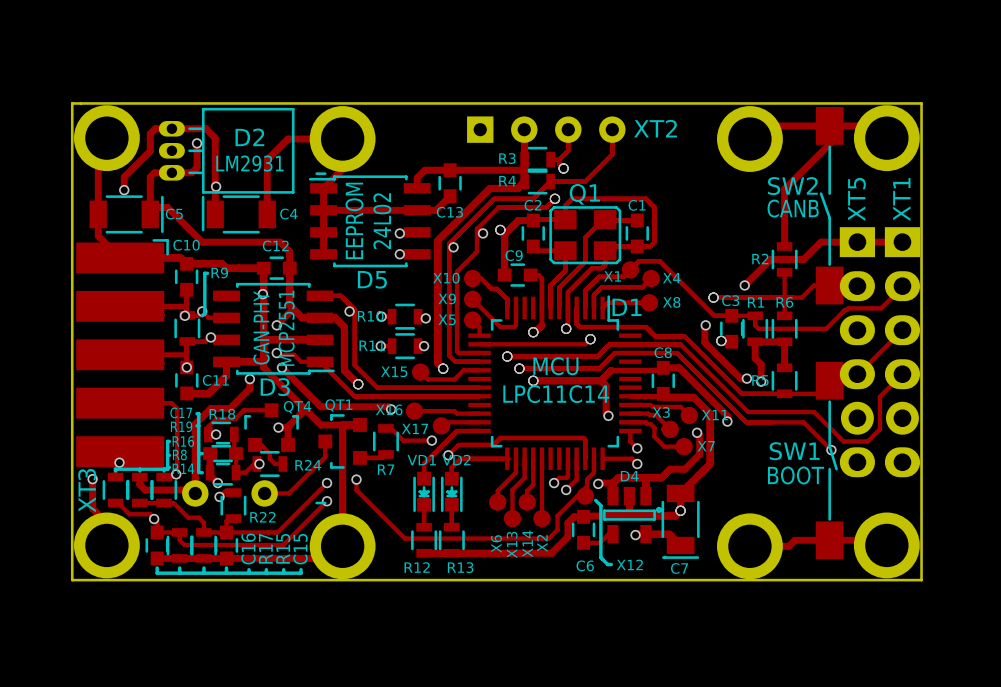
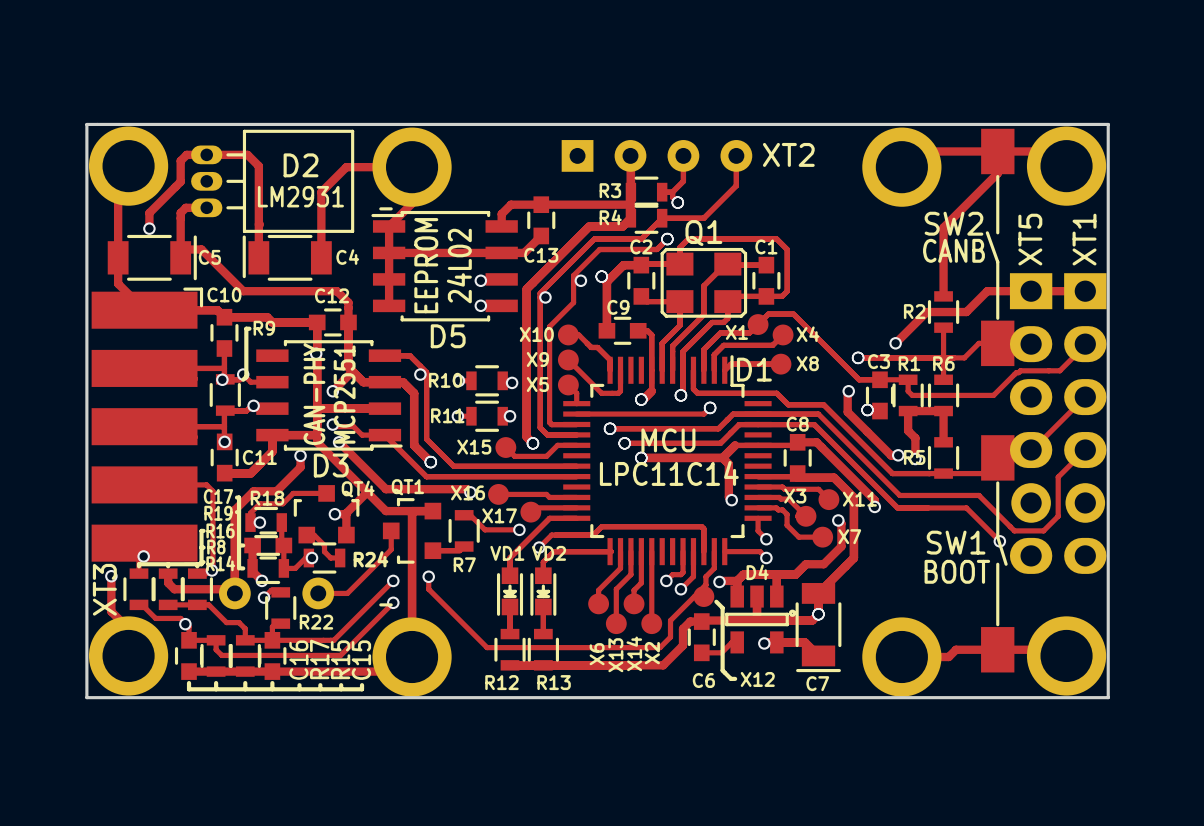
track: (197, 143) (197, 167) (191, 172) (171, 172) -> none
via: (197, 143) -> none
via: (216, 186) -> none

